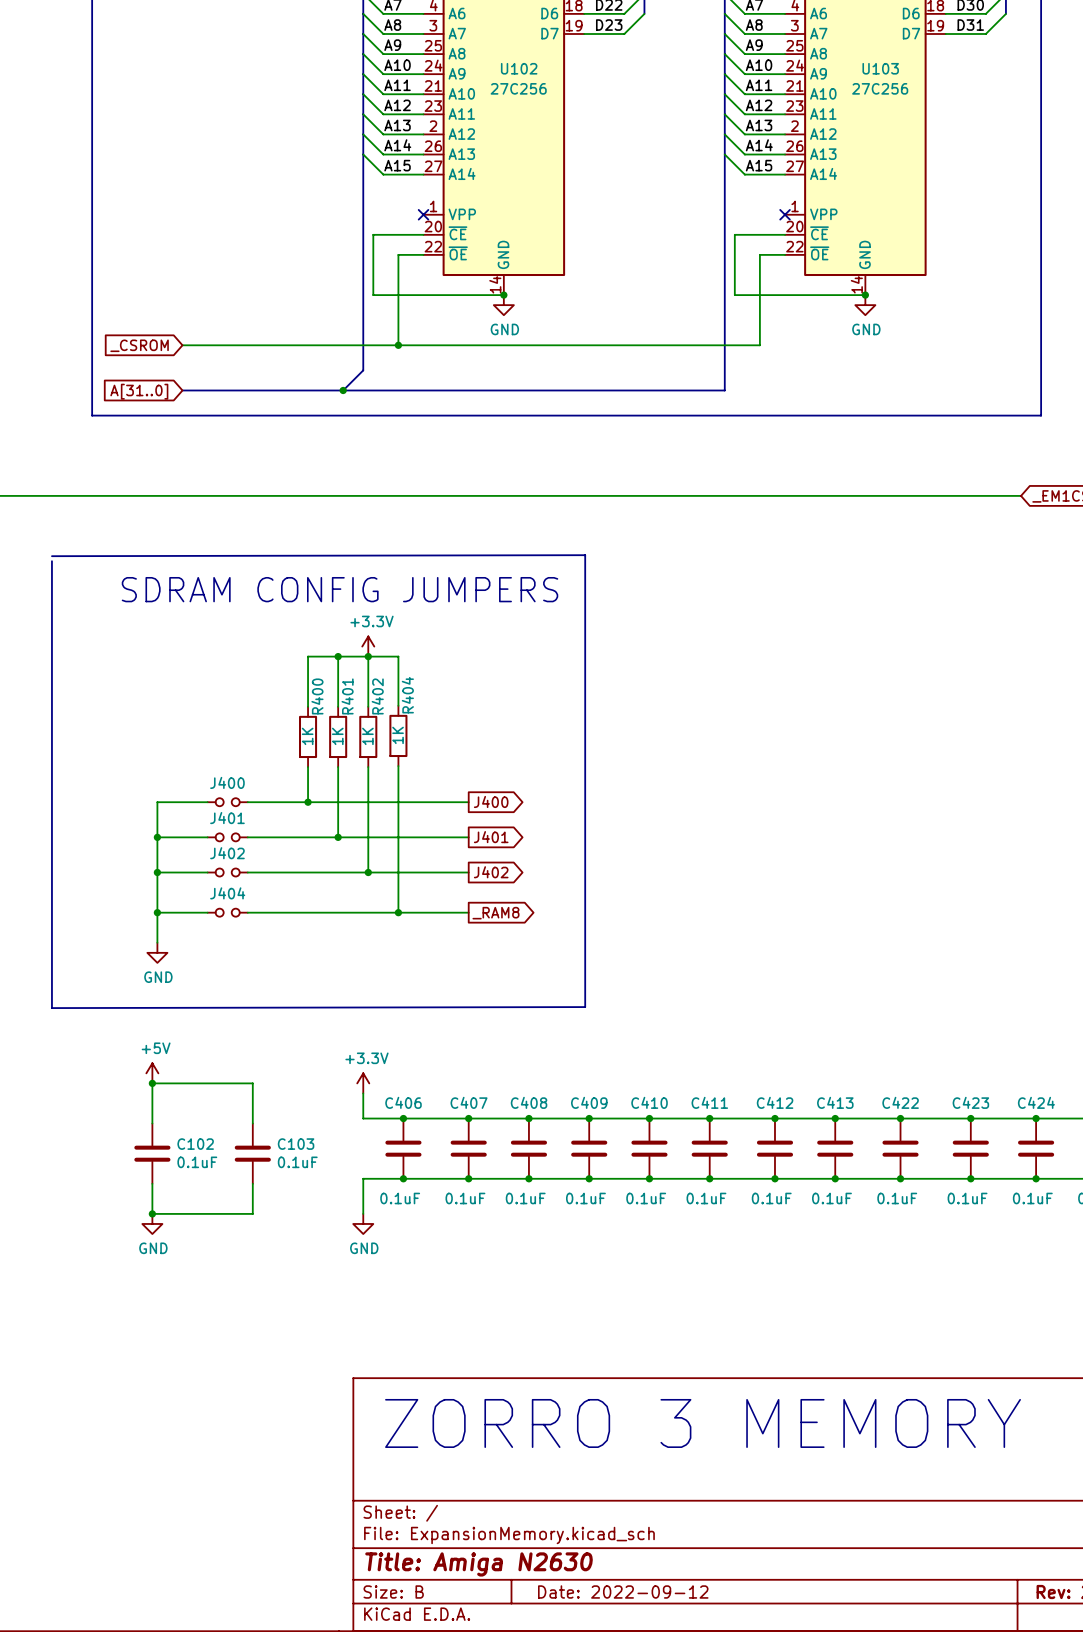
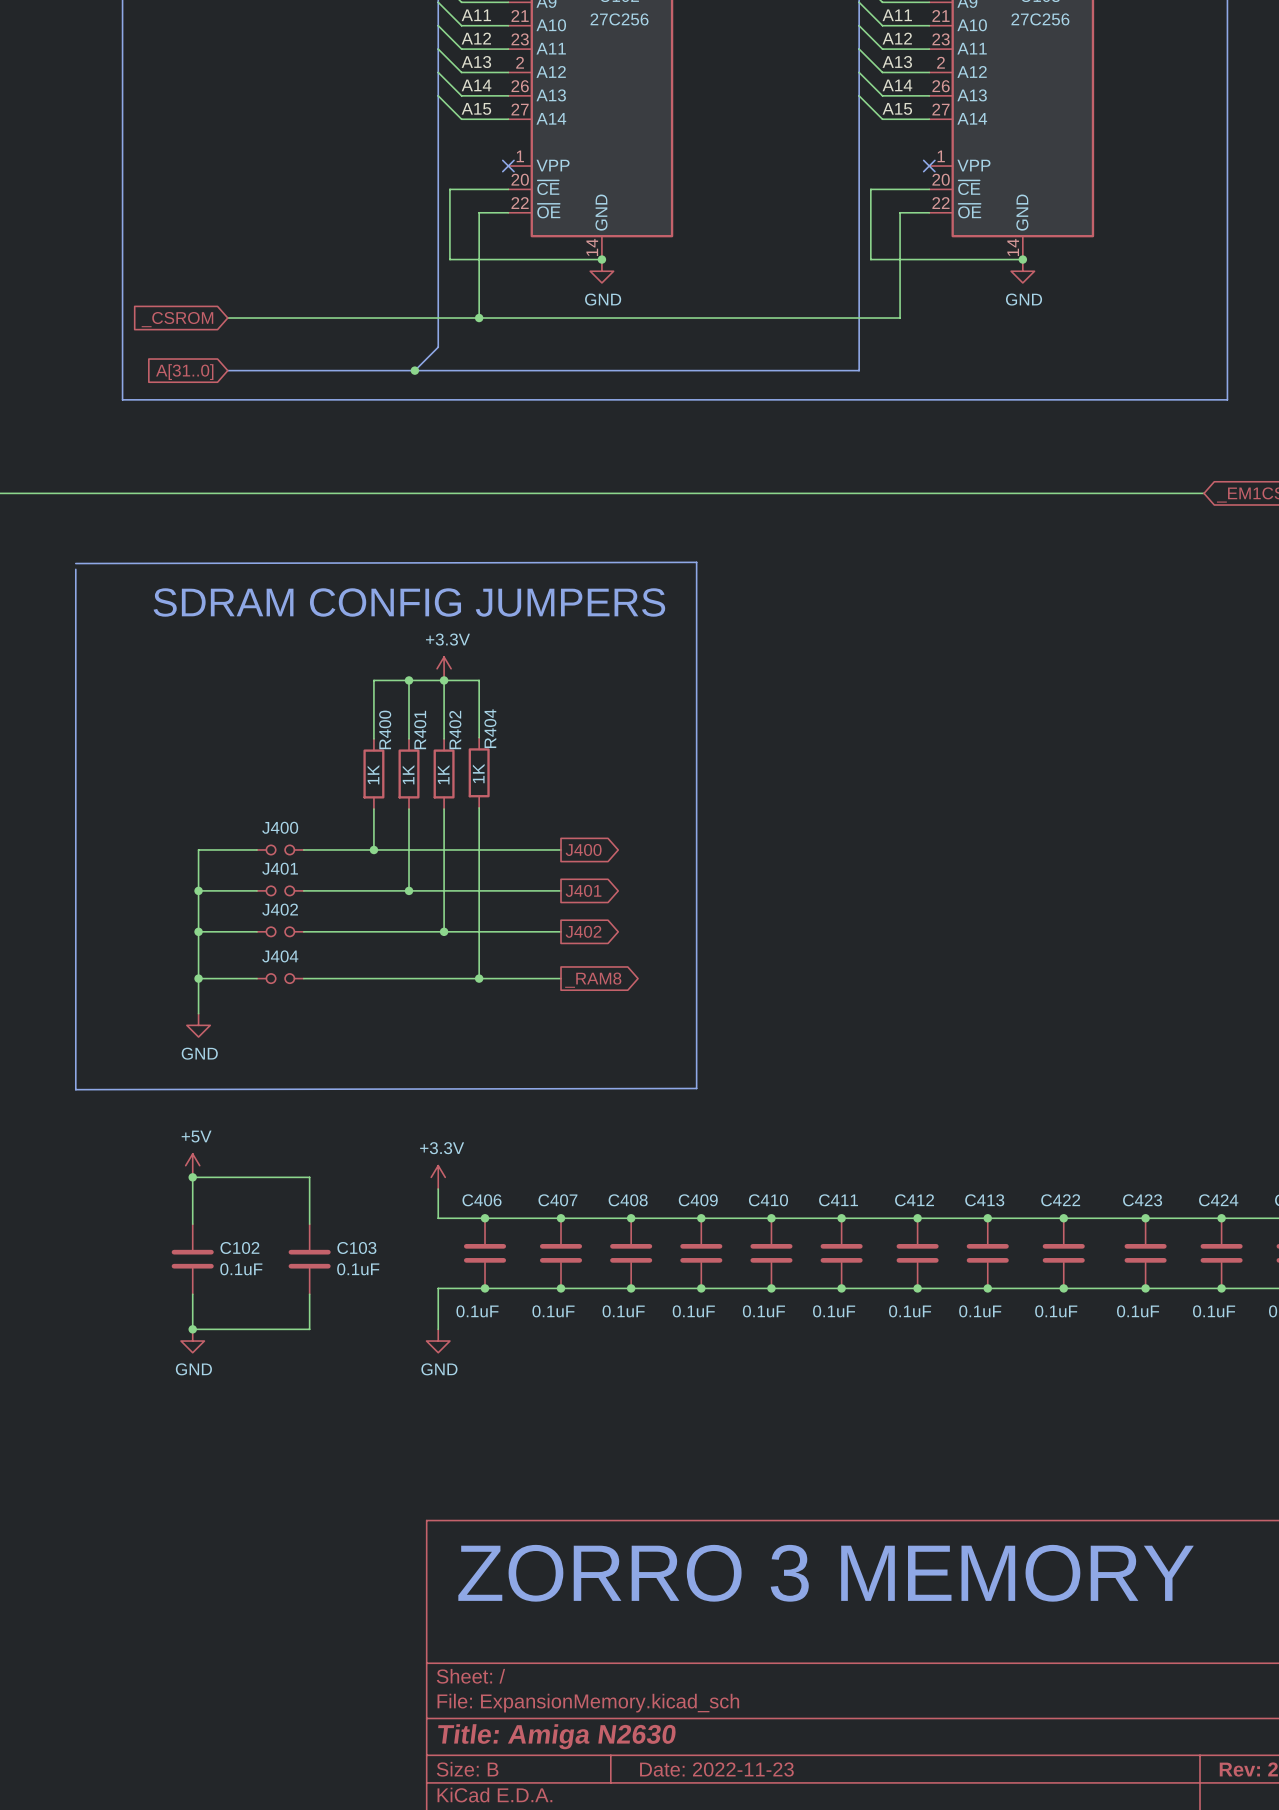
title block: Date: 2022-09-12 (623, 1592) -> Date: 2022-11-23 (716, 1769)

